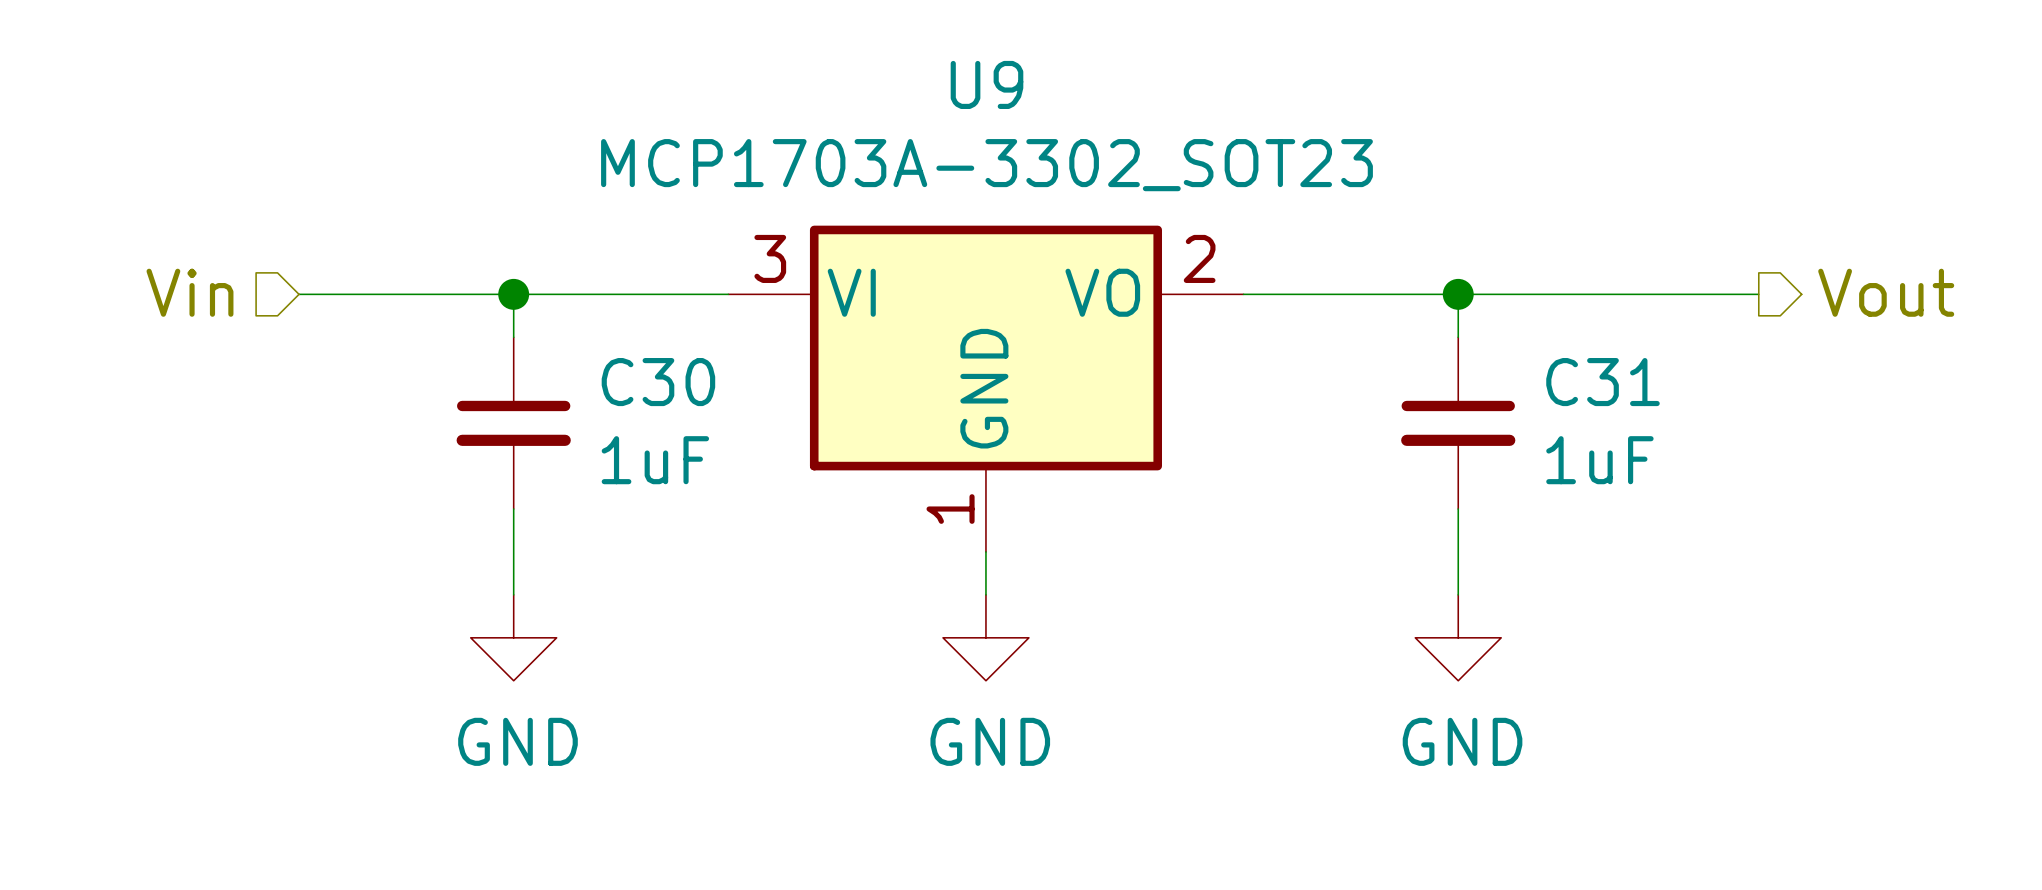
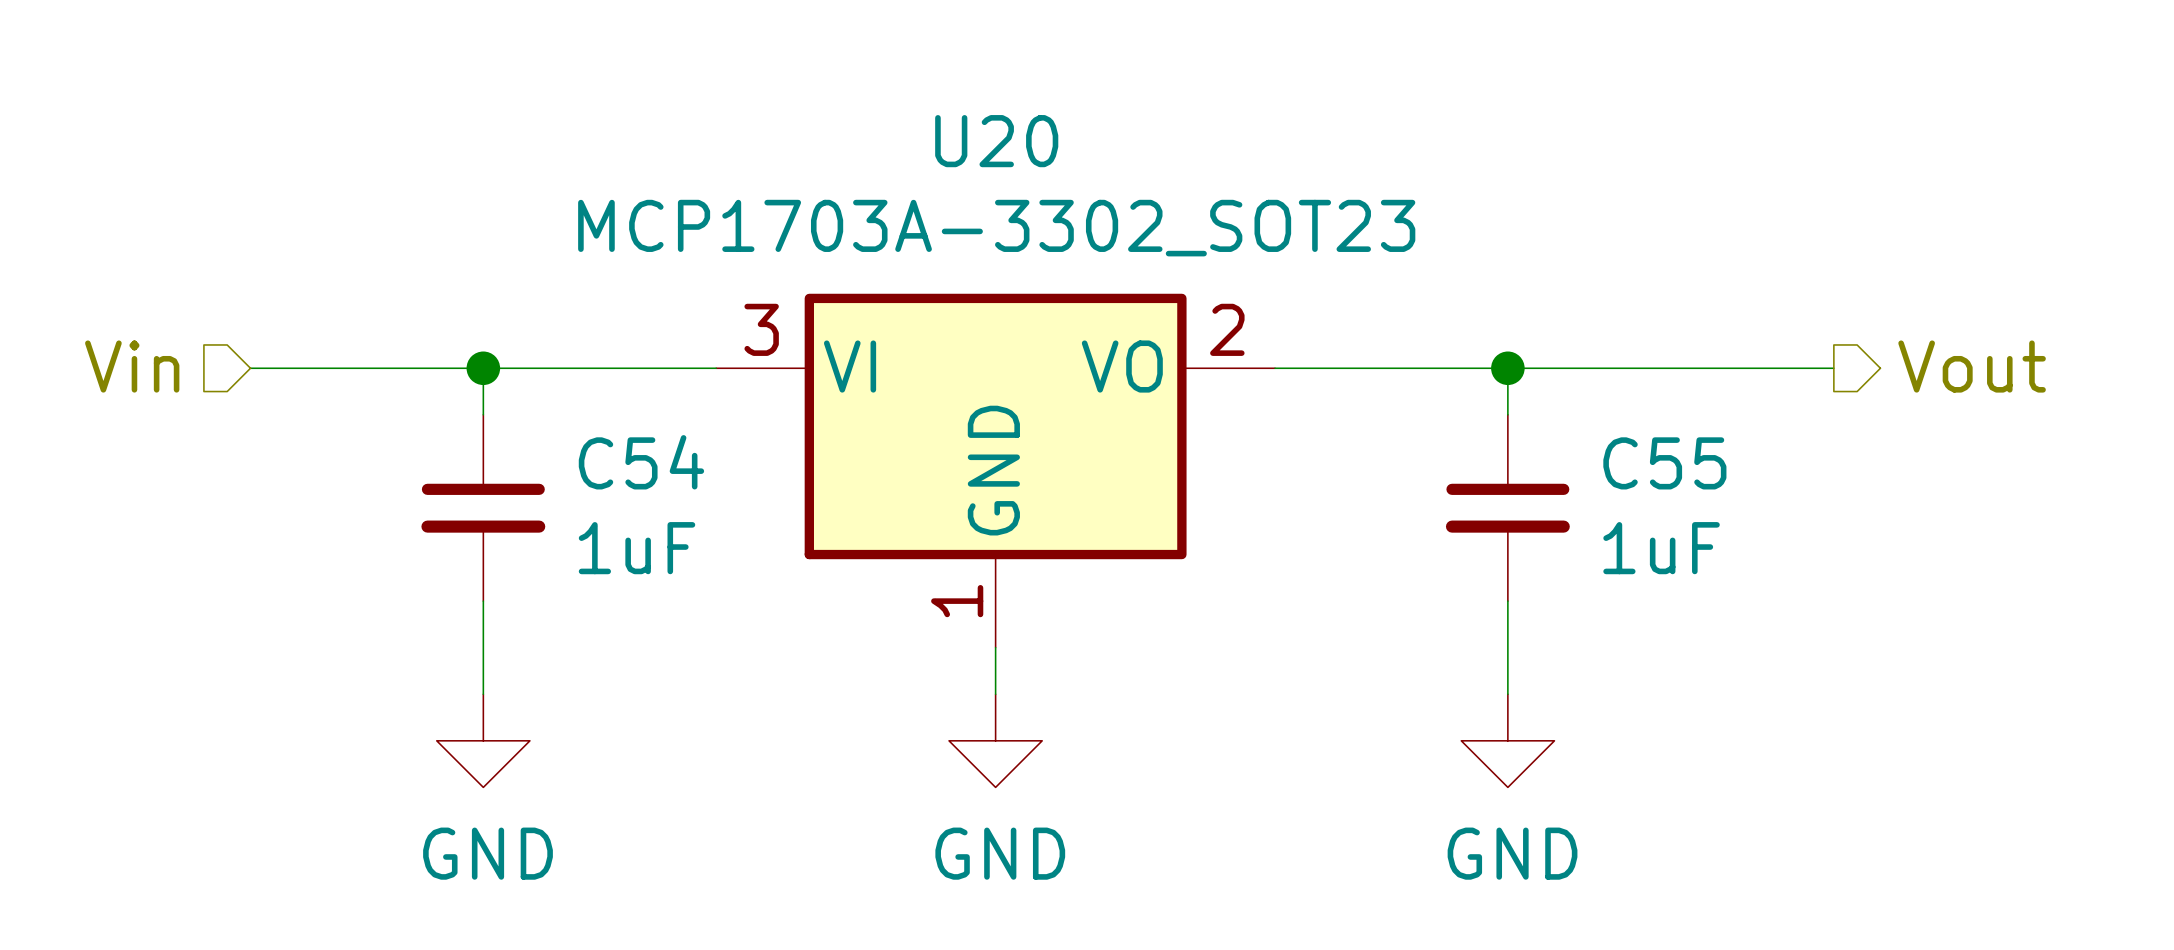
U9 name: U9 (986, 84) -> U20 (996, 141)
C30 name: C30 (658, 382) -> C54 (641, 462)
C31 name: C31 (1602, 382) -> C55 (1664, 463)

